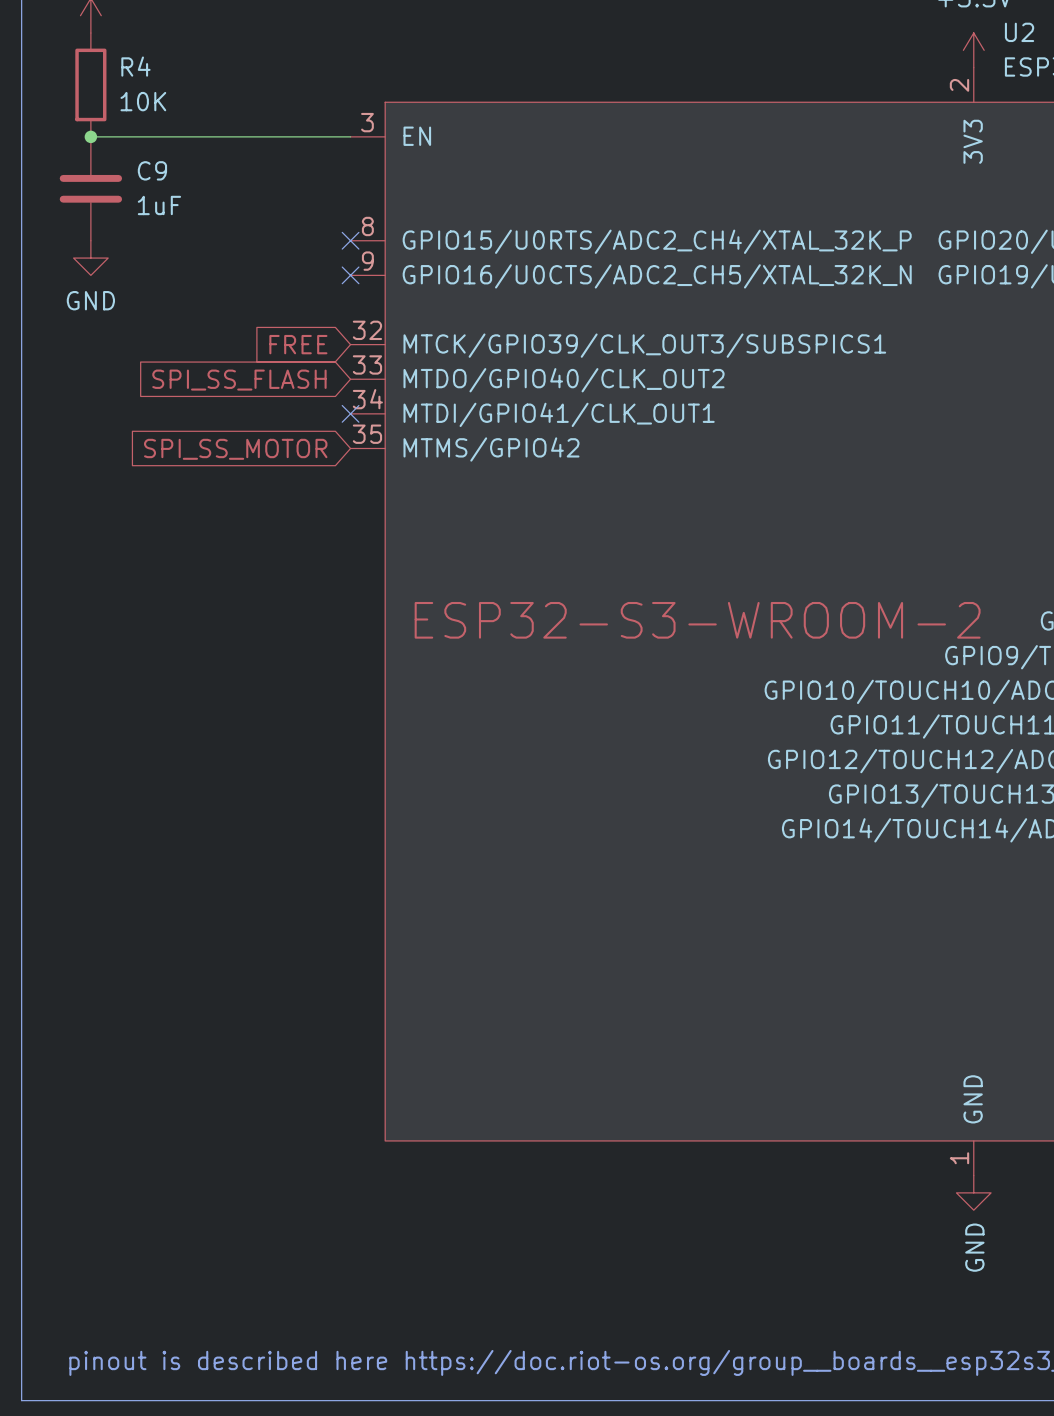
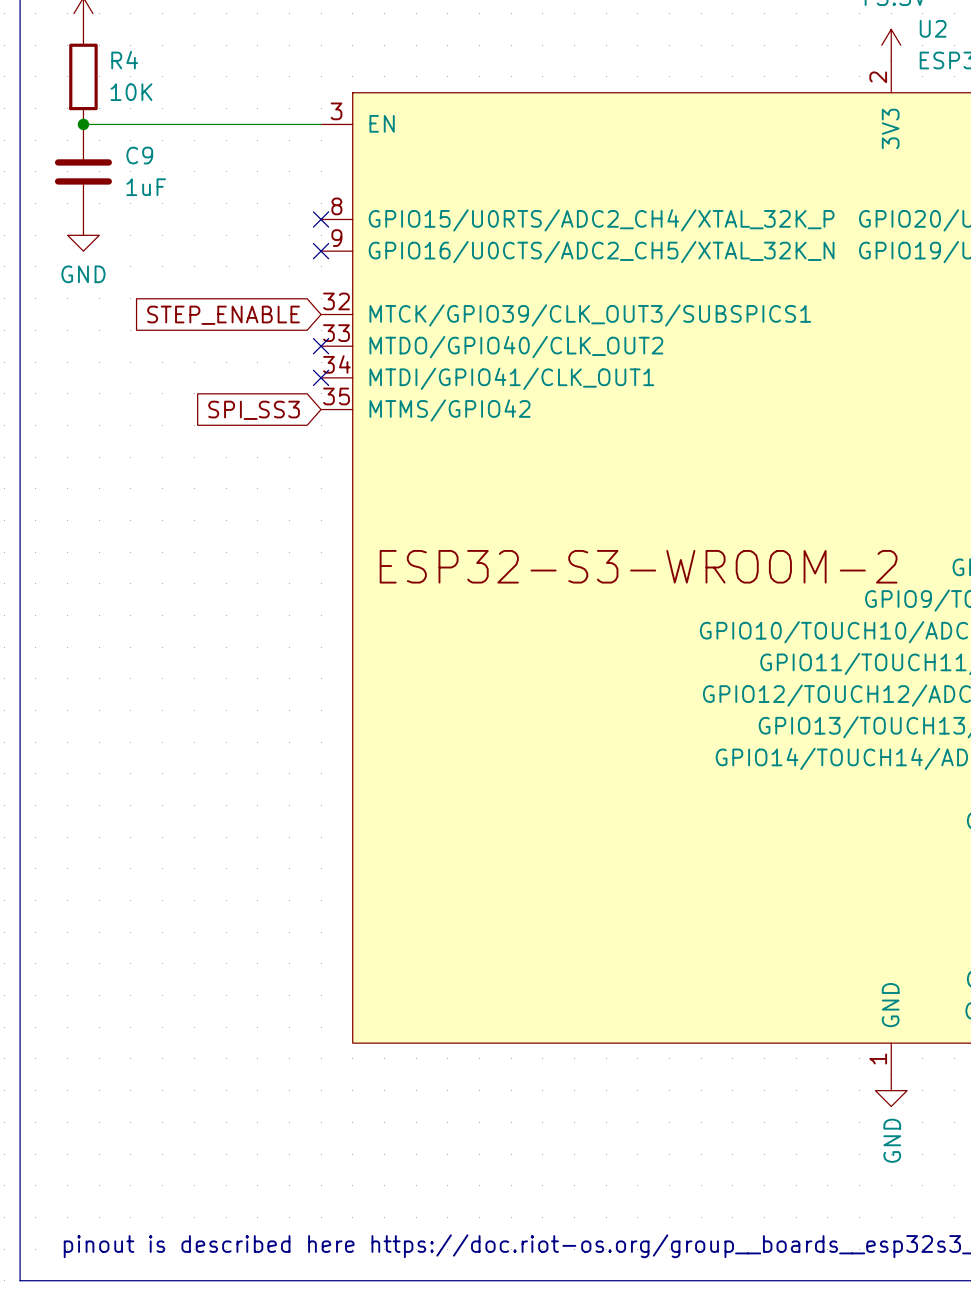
global label: FREE (298, 344) -> STEP_ENABLE (223, 315)
no-connect mark: none -> (321, 346)
global label: SPI_SS_FLASH (239, 380) -> none
global label: SPI_SS_MOTOR (235, 449) -> SPI_SS3 (254, 410)

